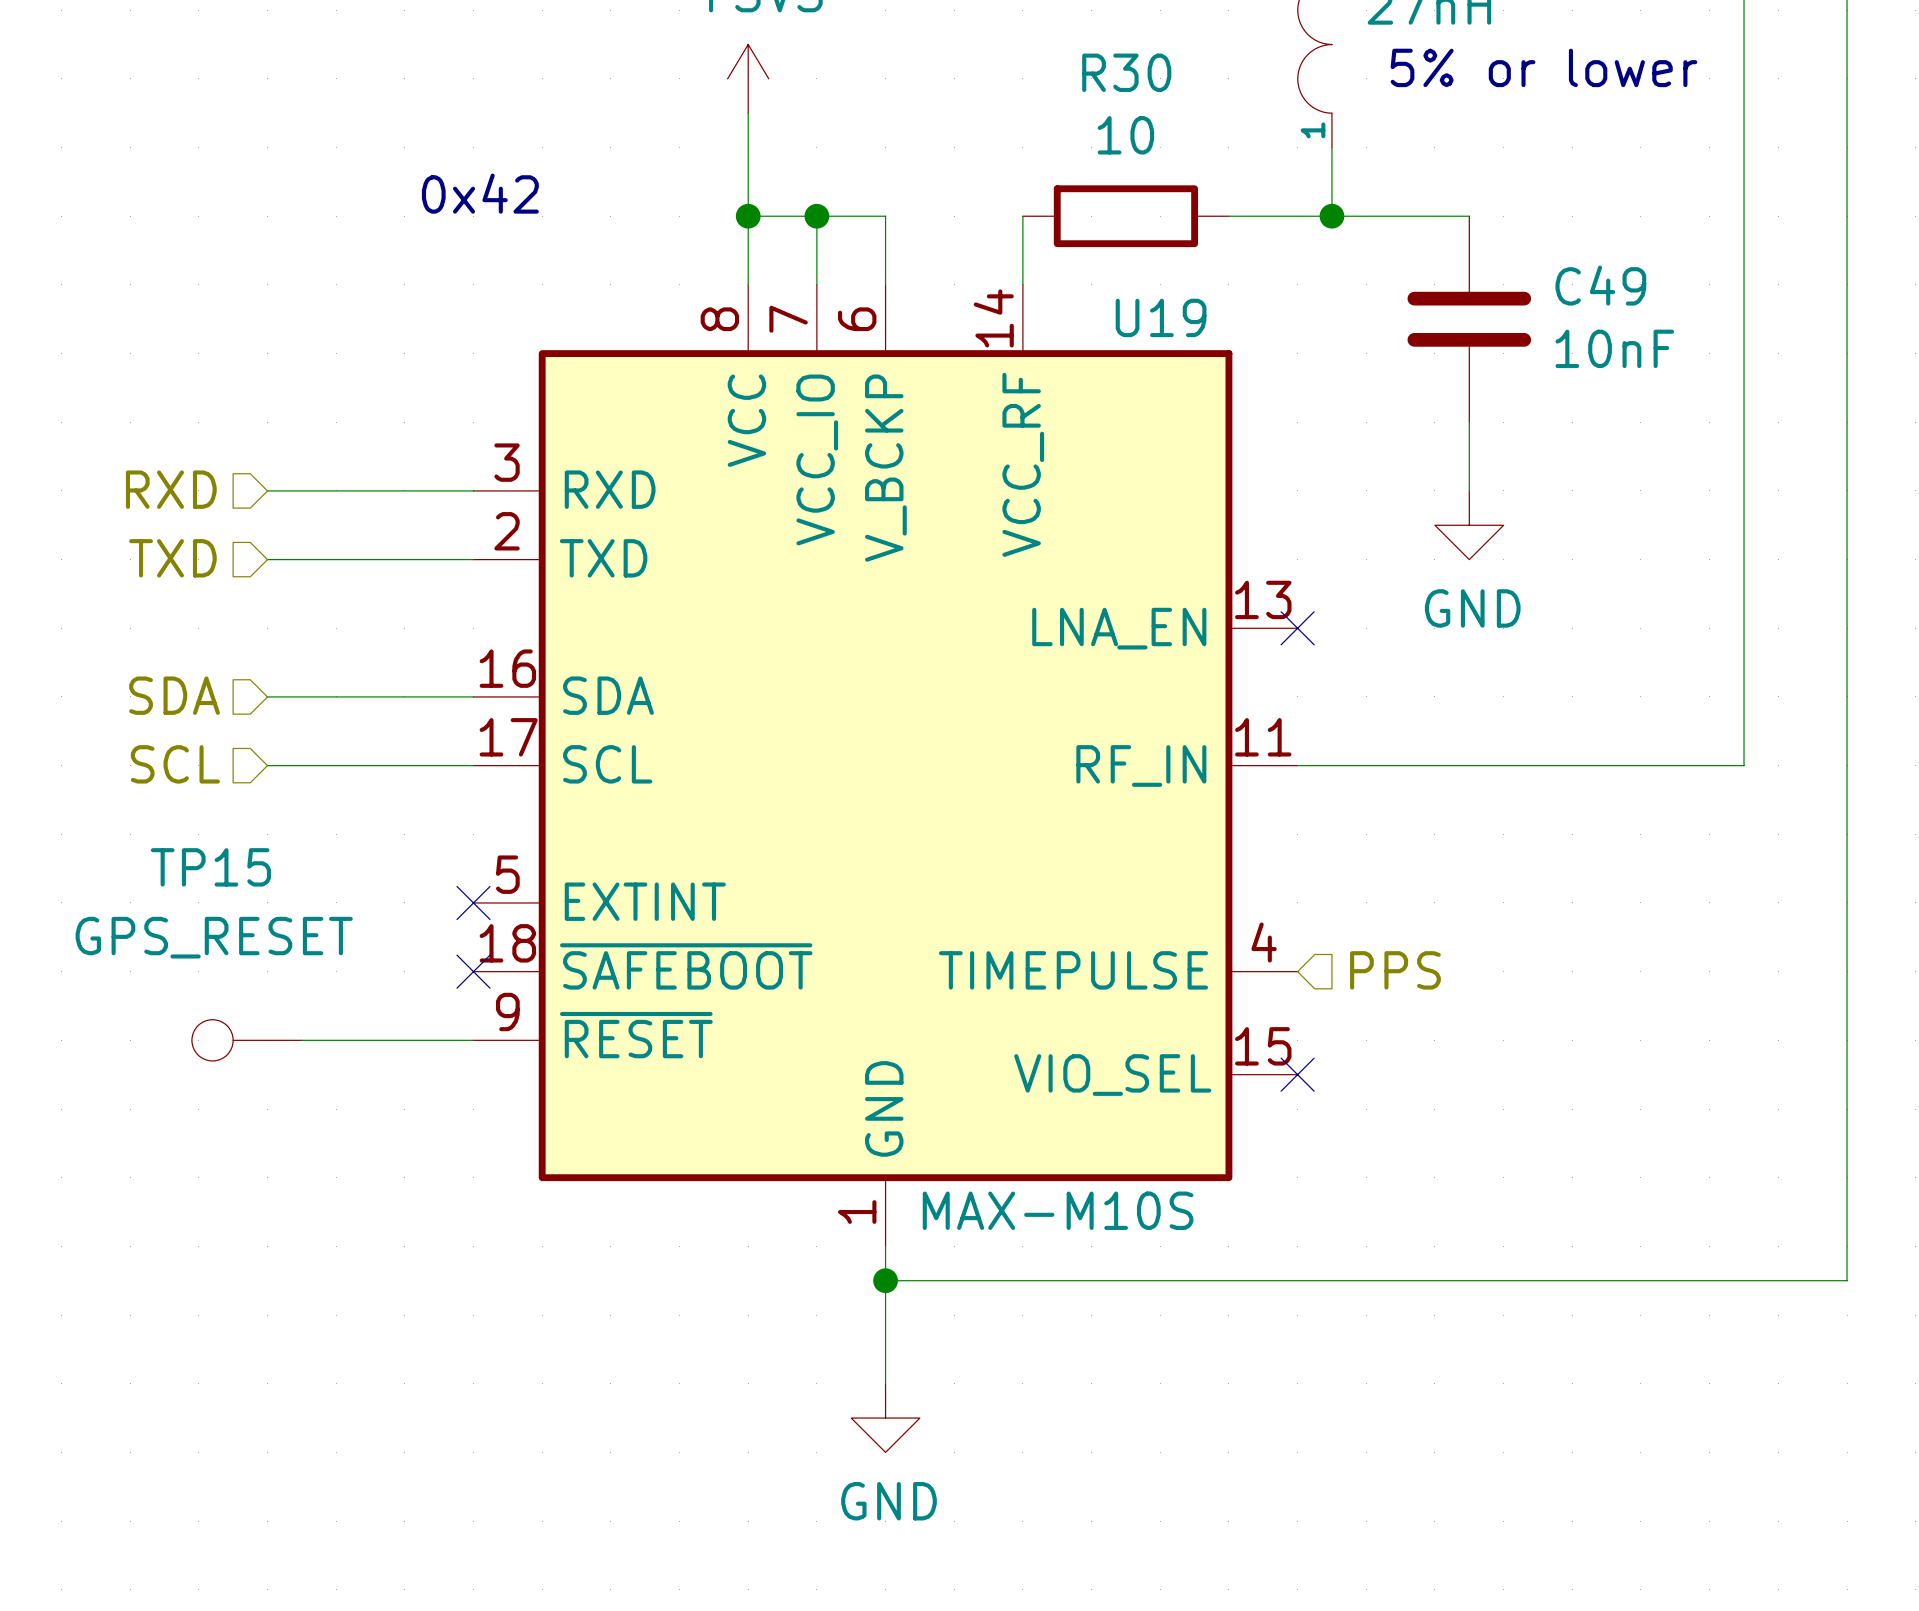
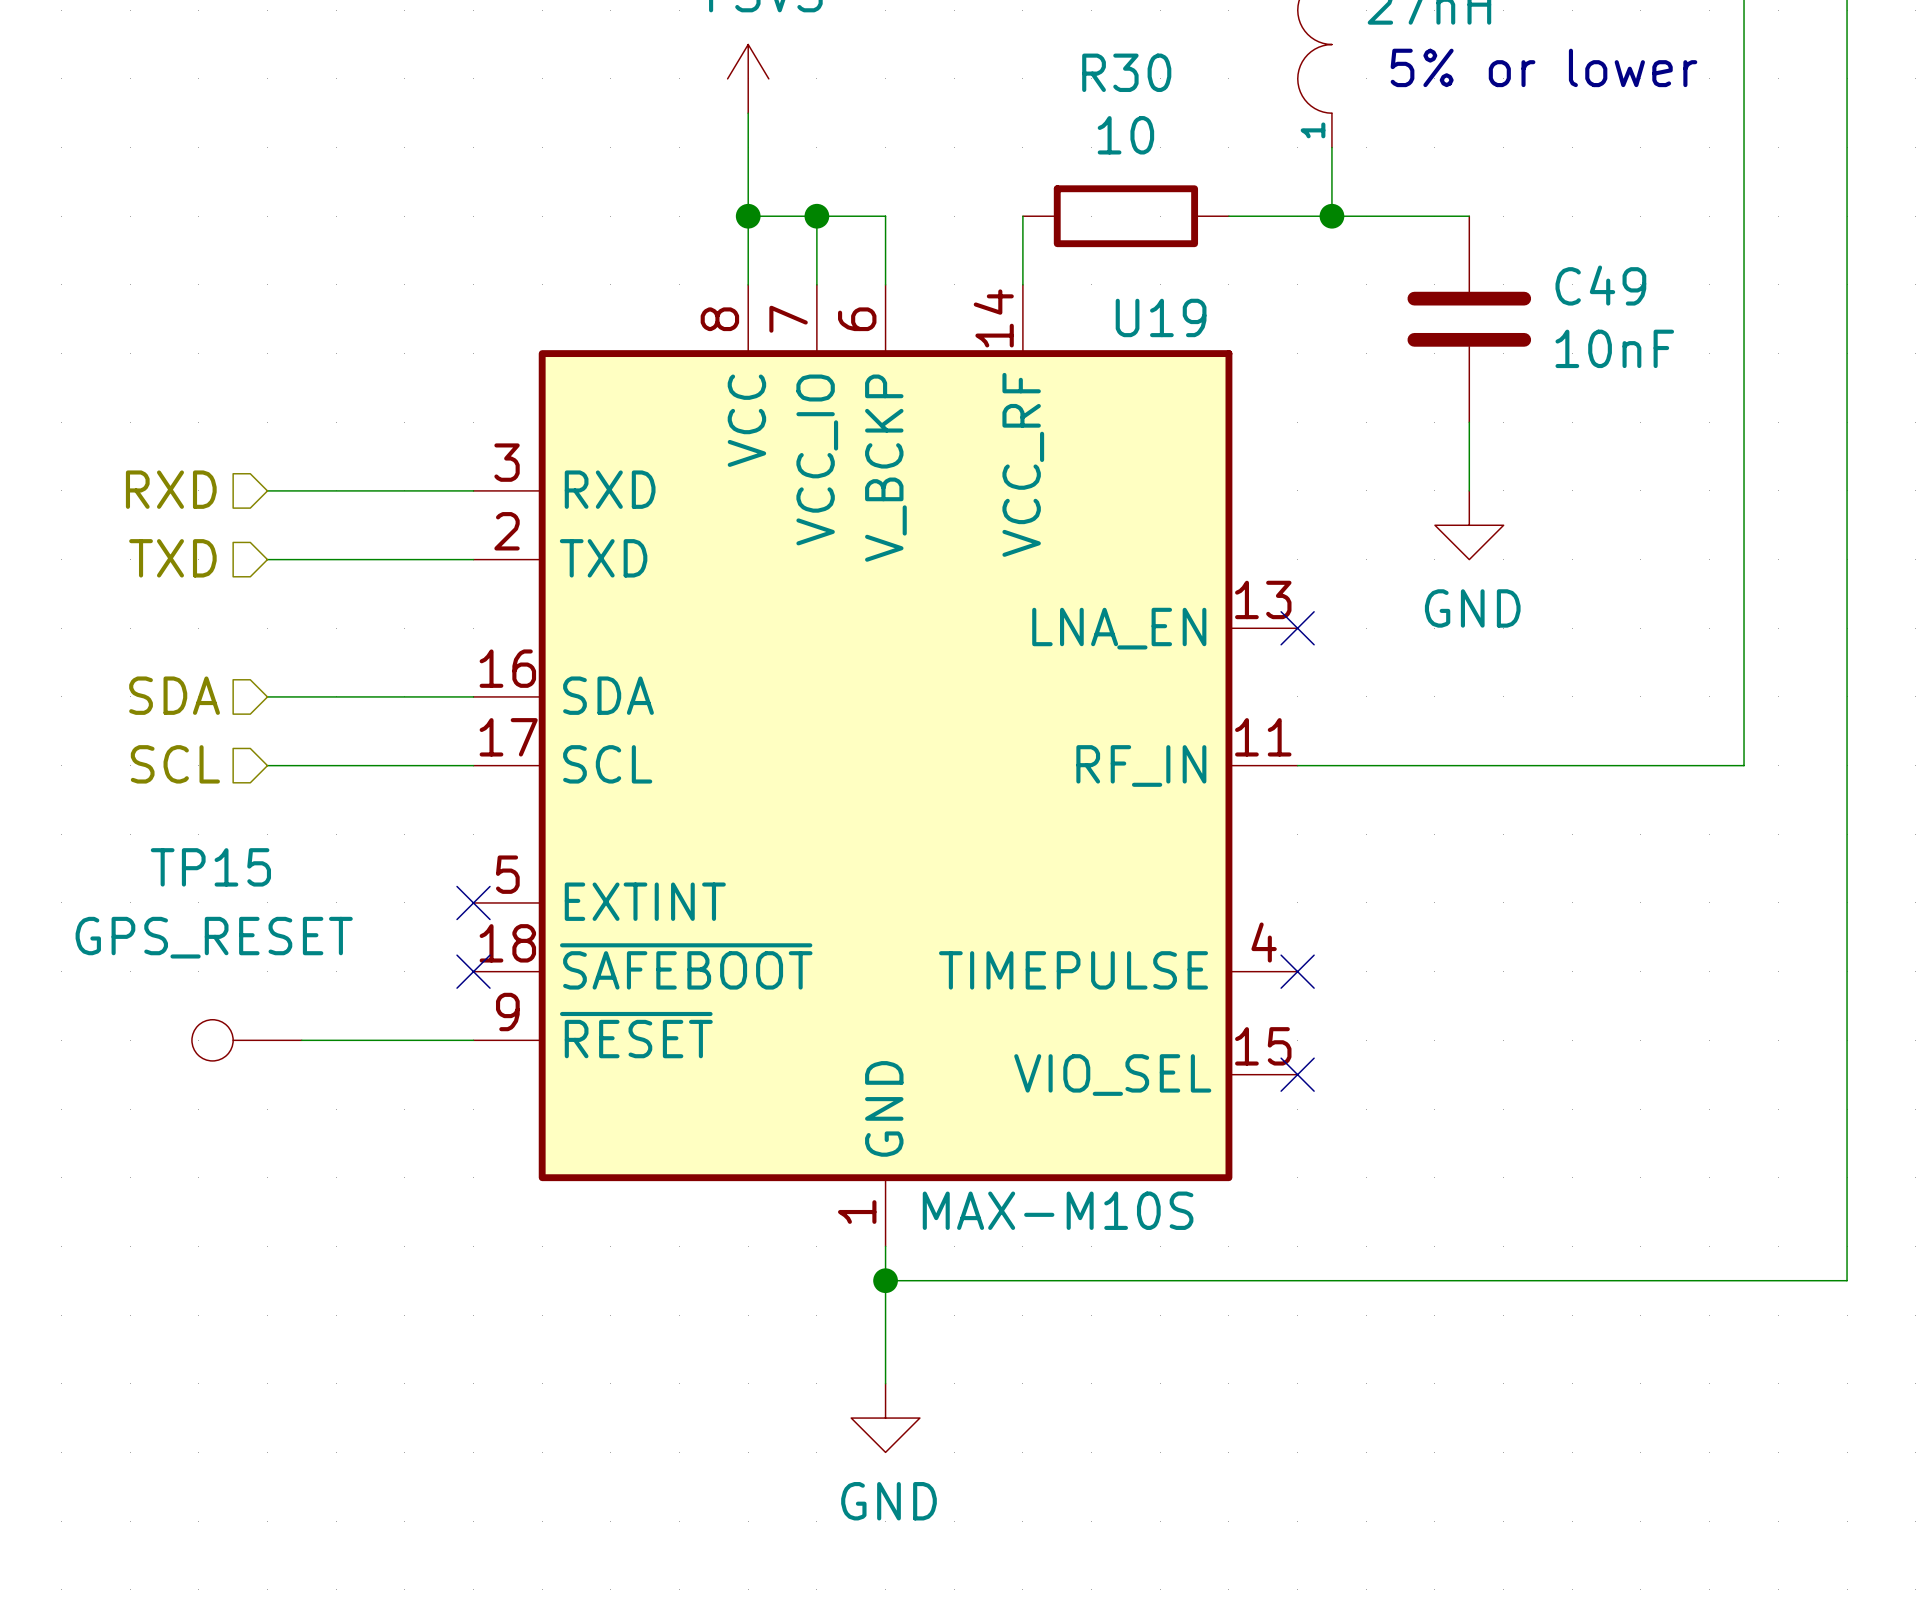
text: 0x42 (480, 193) -> none
hierarchical label: PPS (1395, 970) -> none
no-connect mark: none -> (1297, 971)

